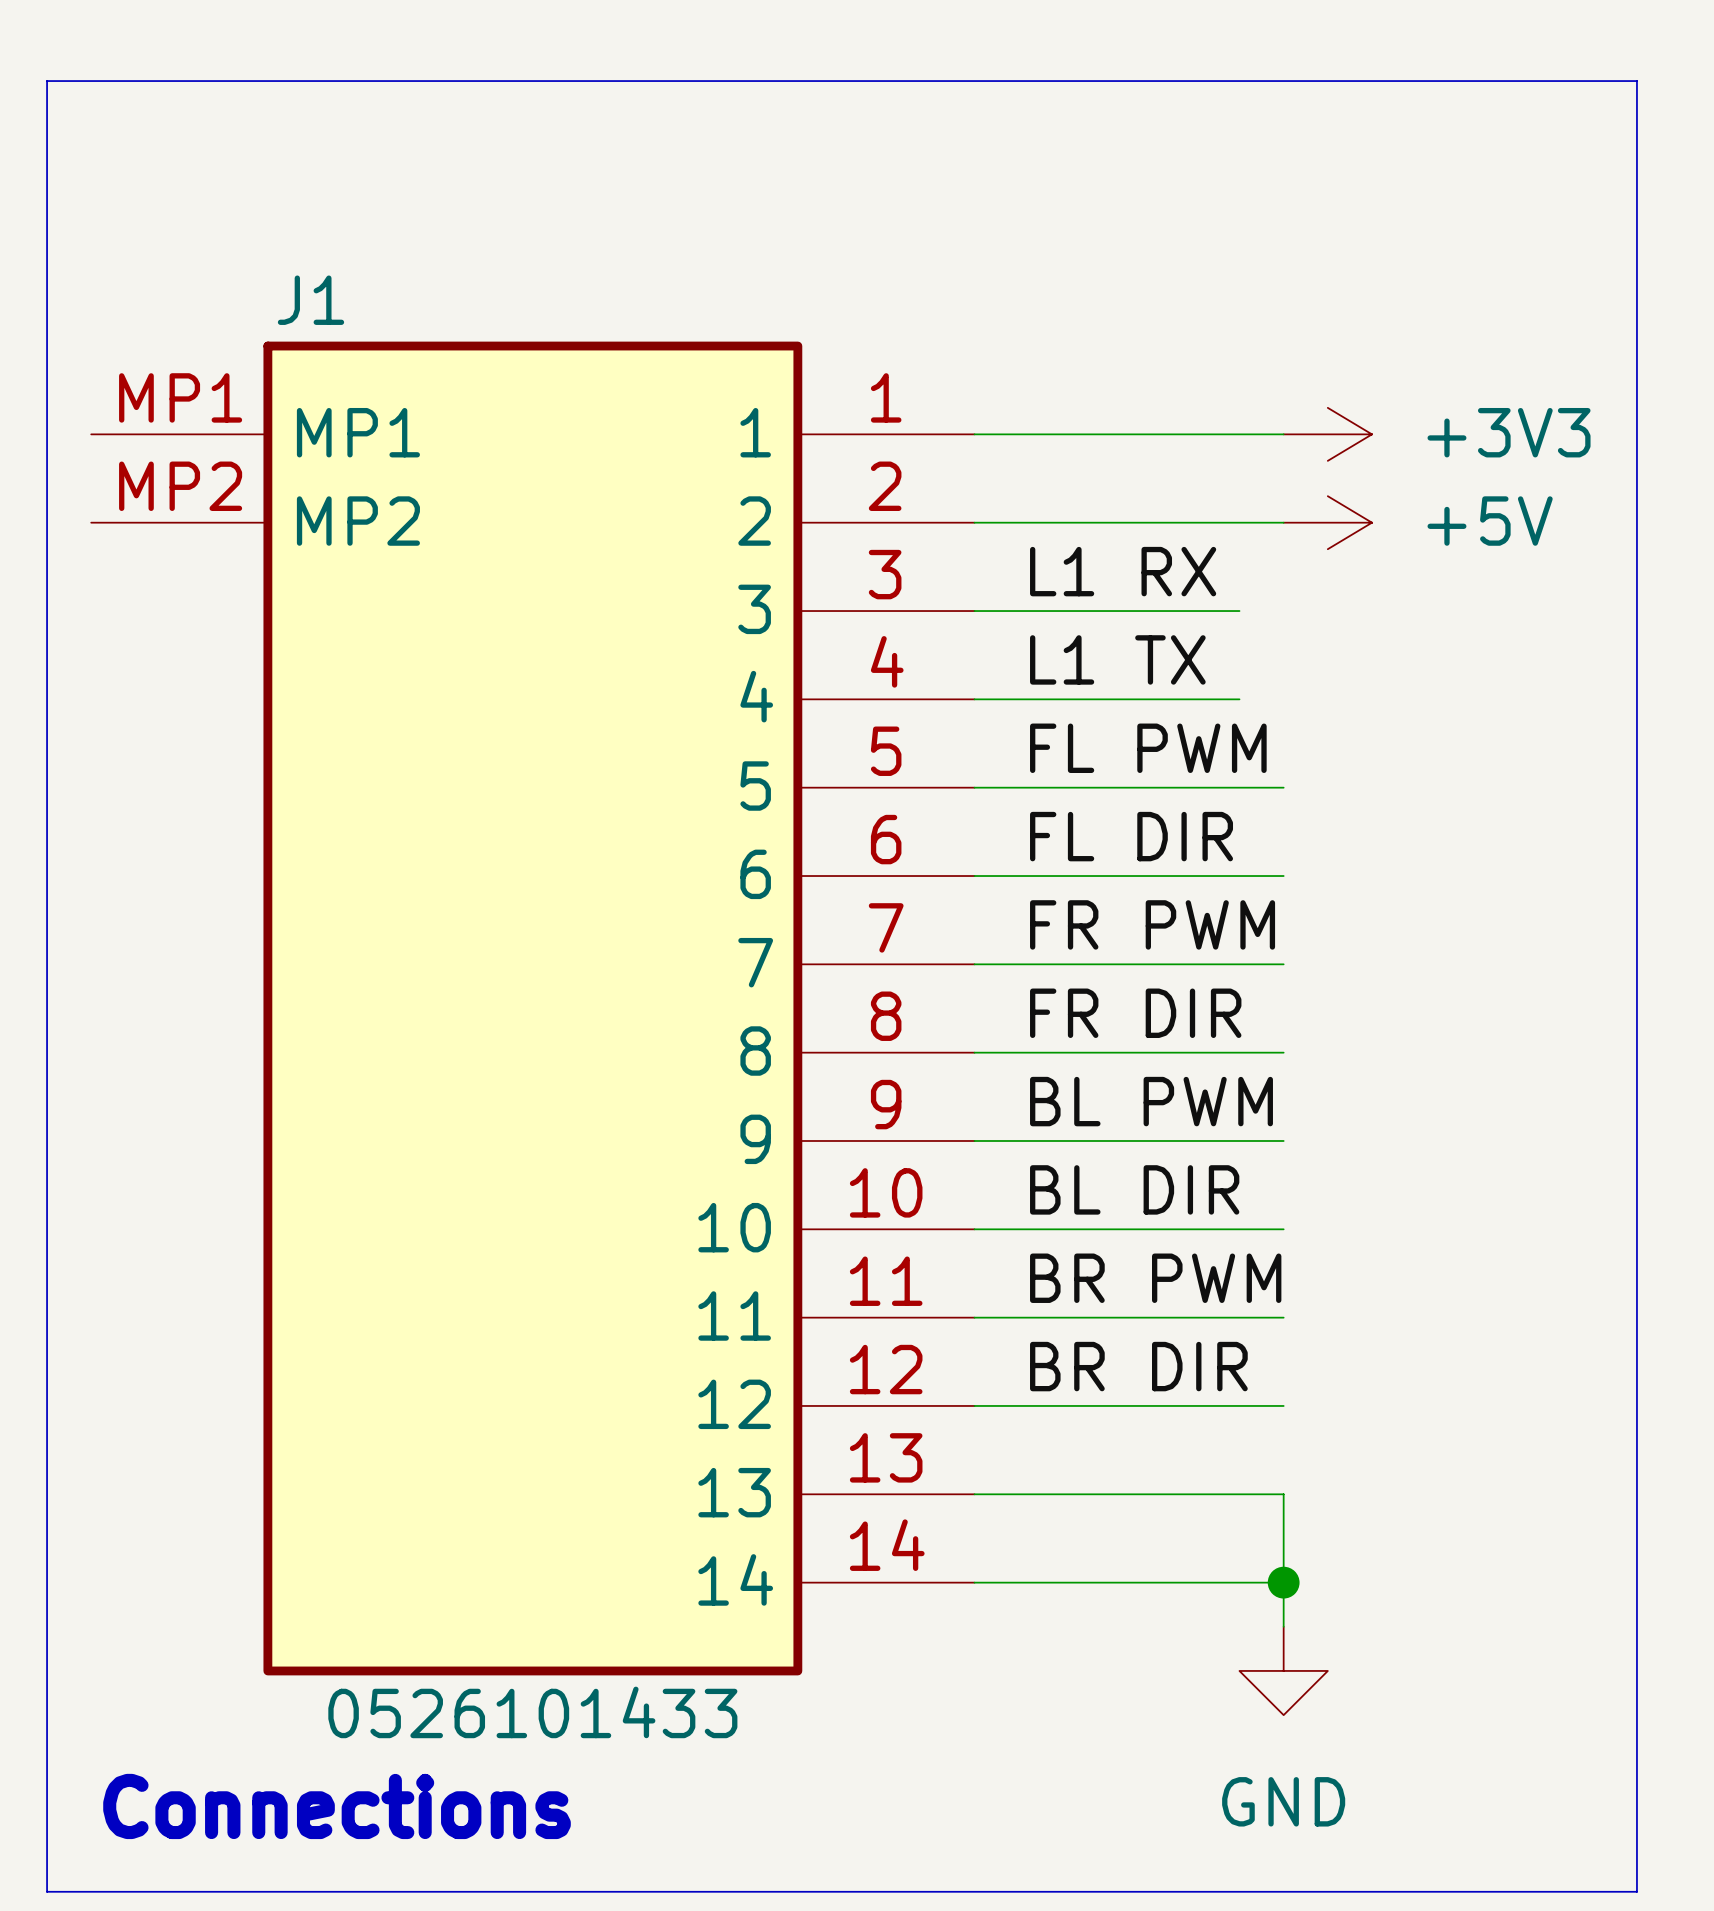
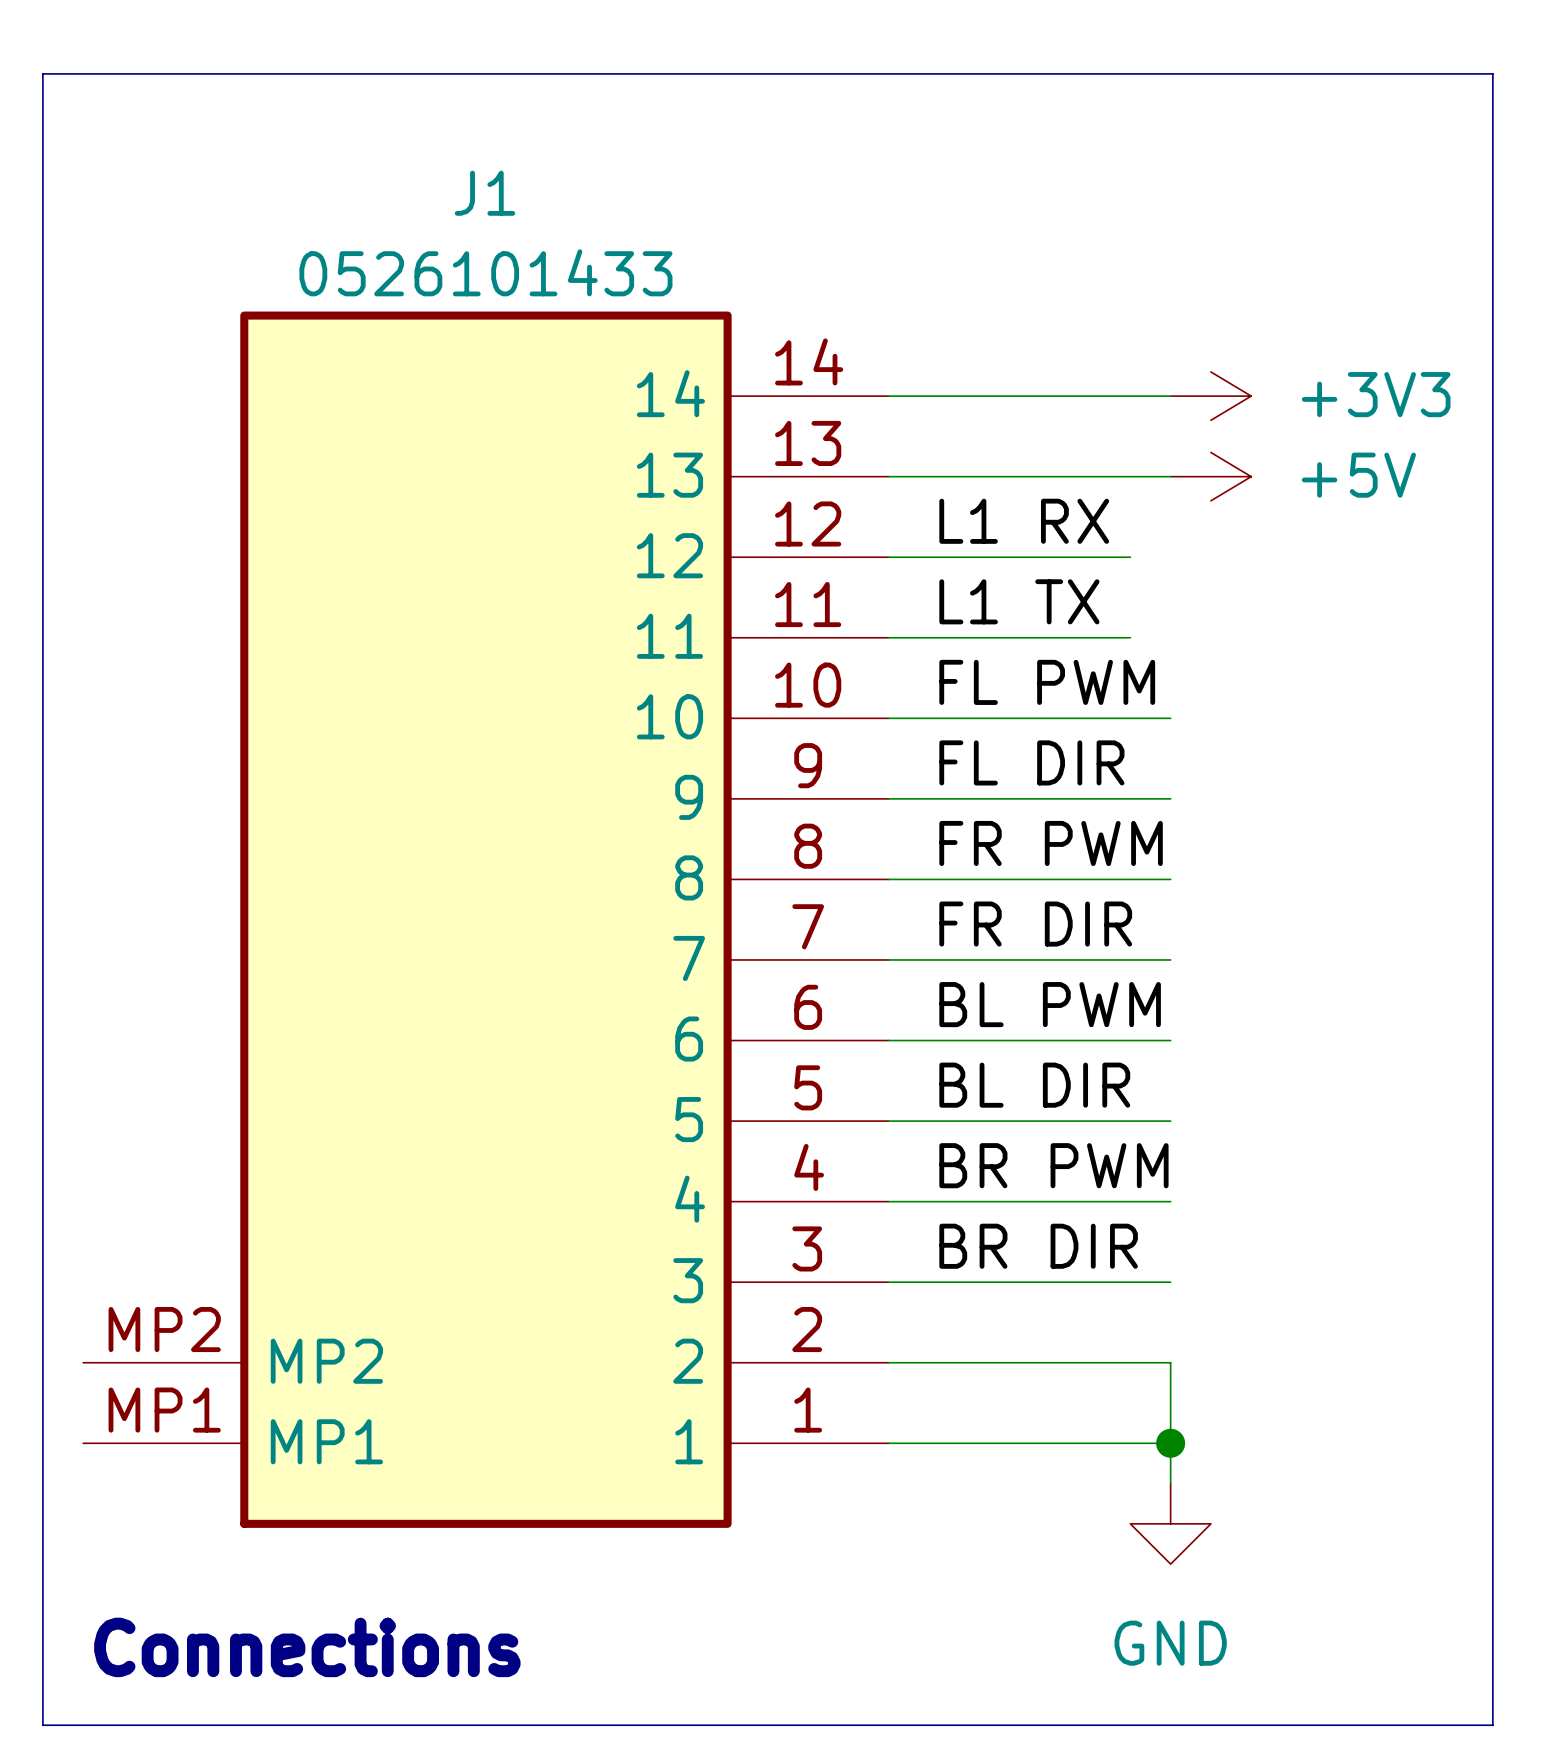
J1 name position: J1 (310, 300) -> J1 (484, 193)
J1 flip: as is (532, 1008) -> up-down (485, 919)

